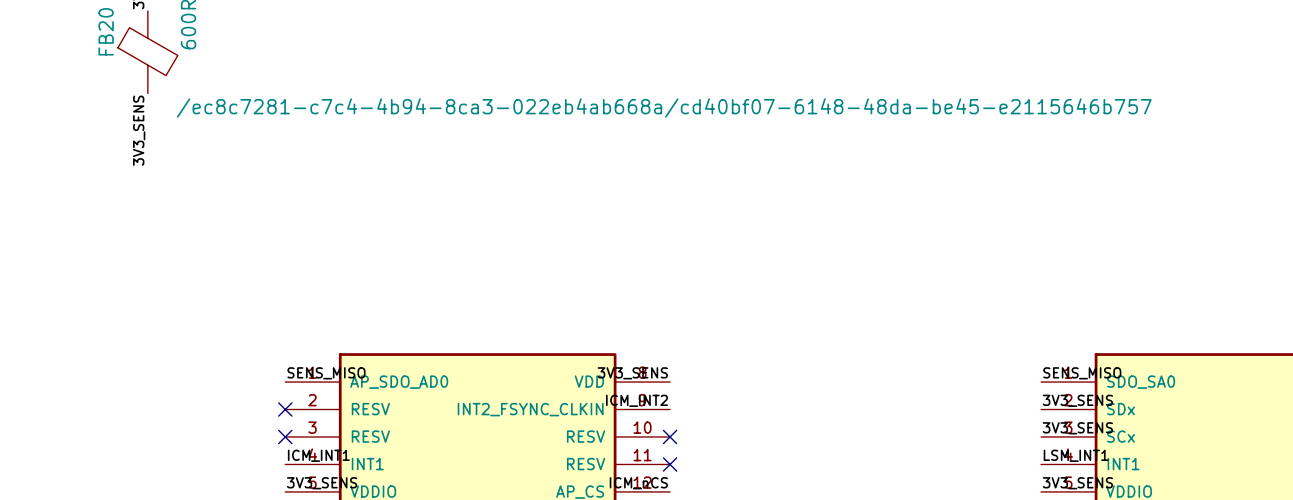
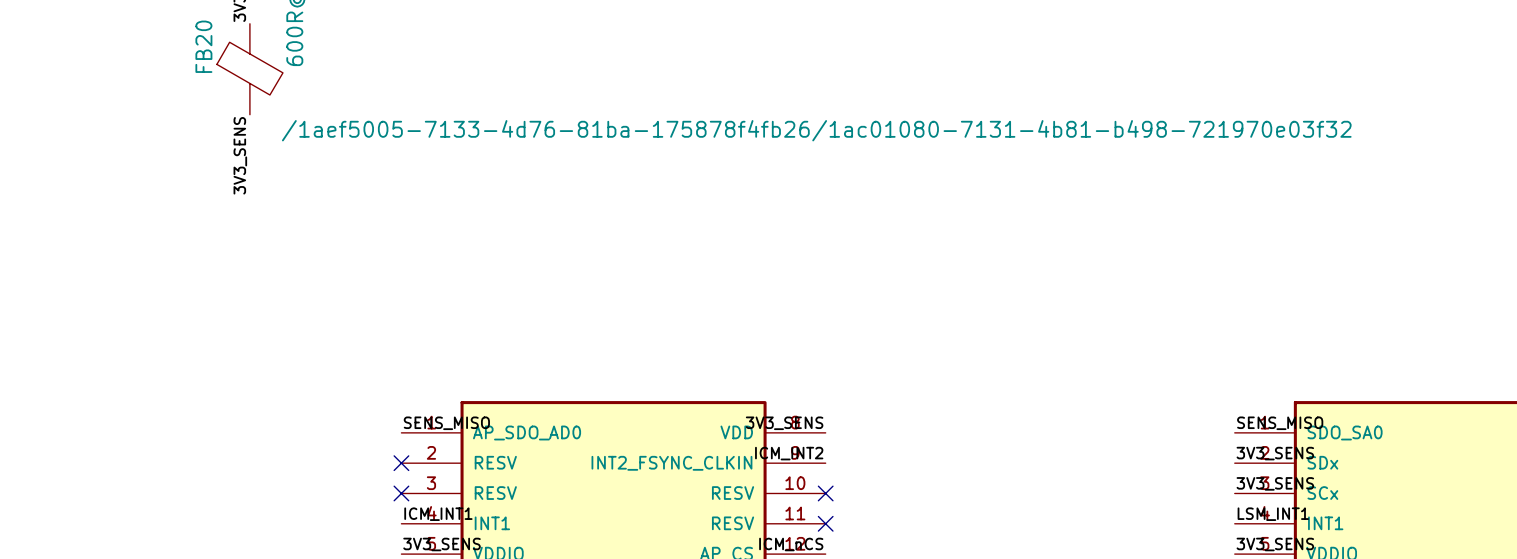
FB20 text: /ec8c7281-c7c4-4b94-8ca3-022eb4ab668a/cd40bf07-6148-48da-be45-e2115646b757 (664, 107) -> /1aef5005-7133-4d76-81ba-175878f4fb26/1ac01080-7131-4b81-b498-721970e03f32 (816, 130)

